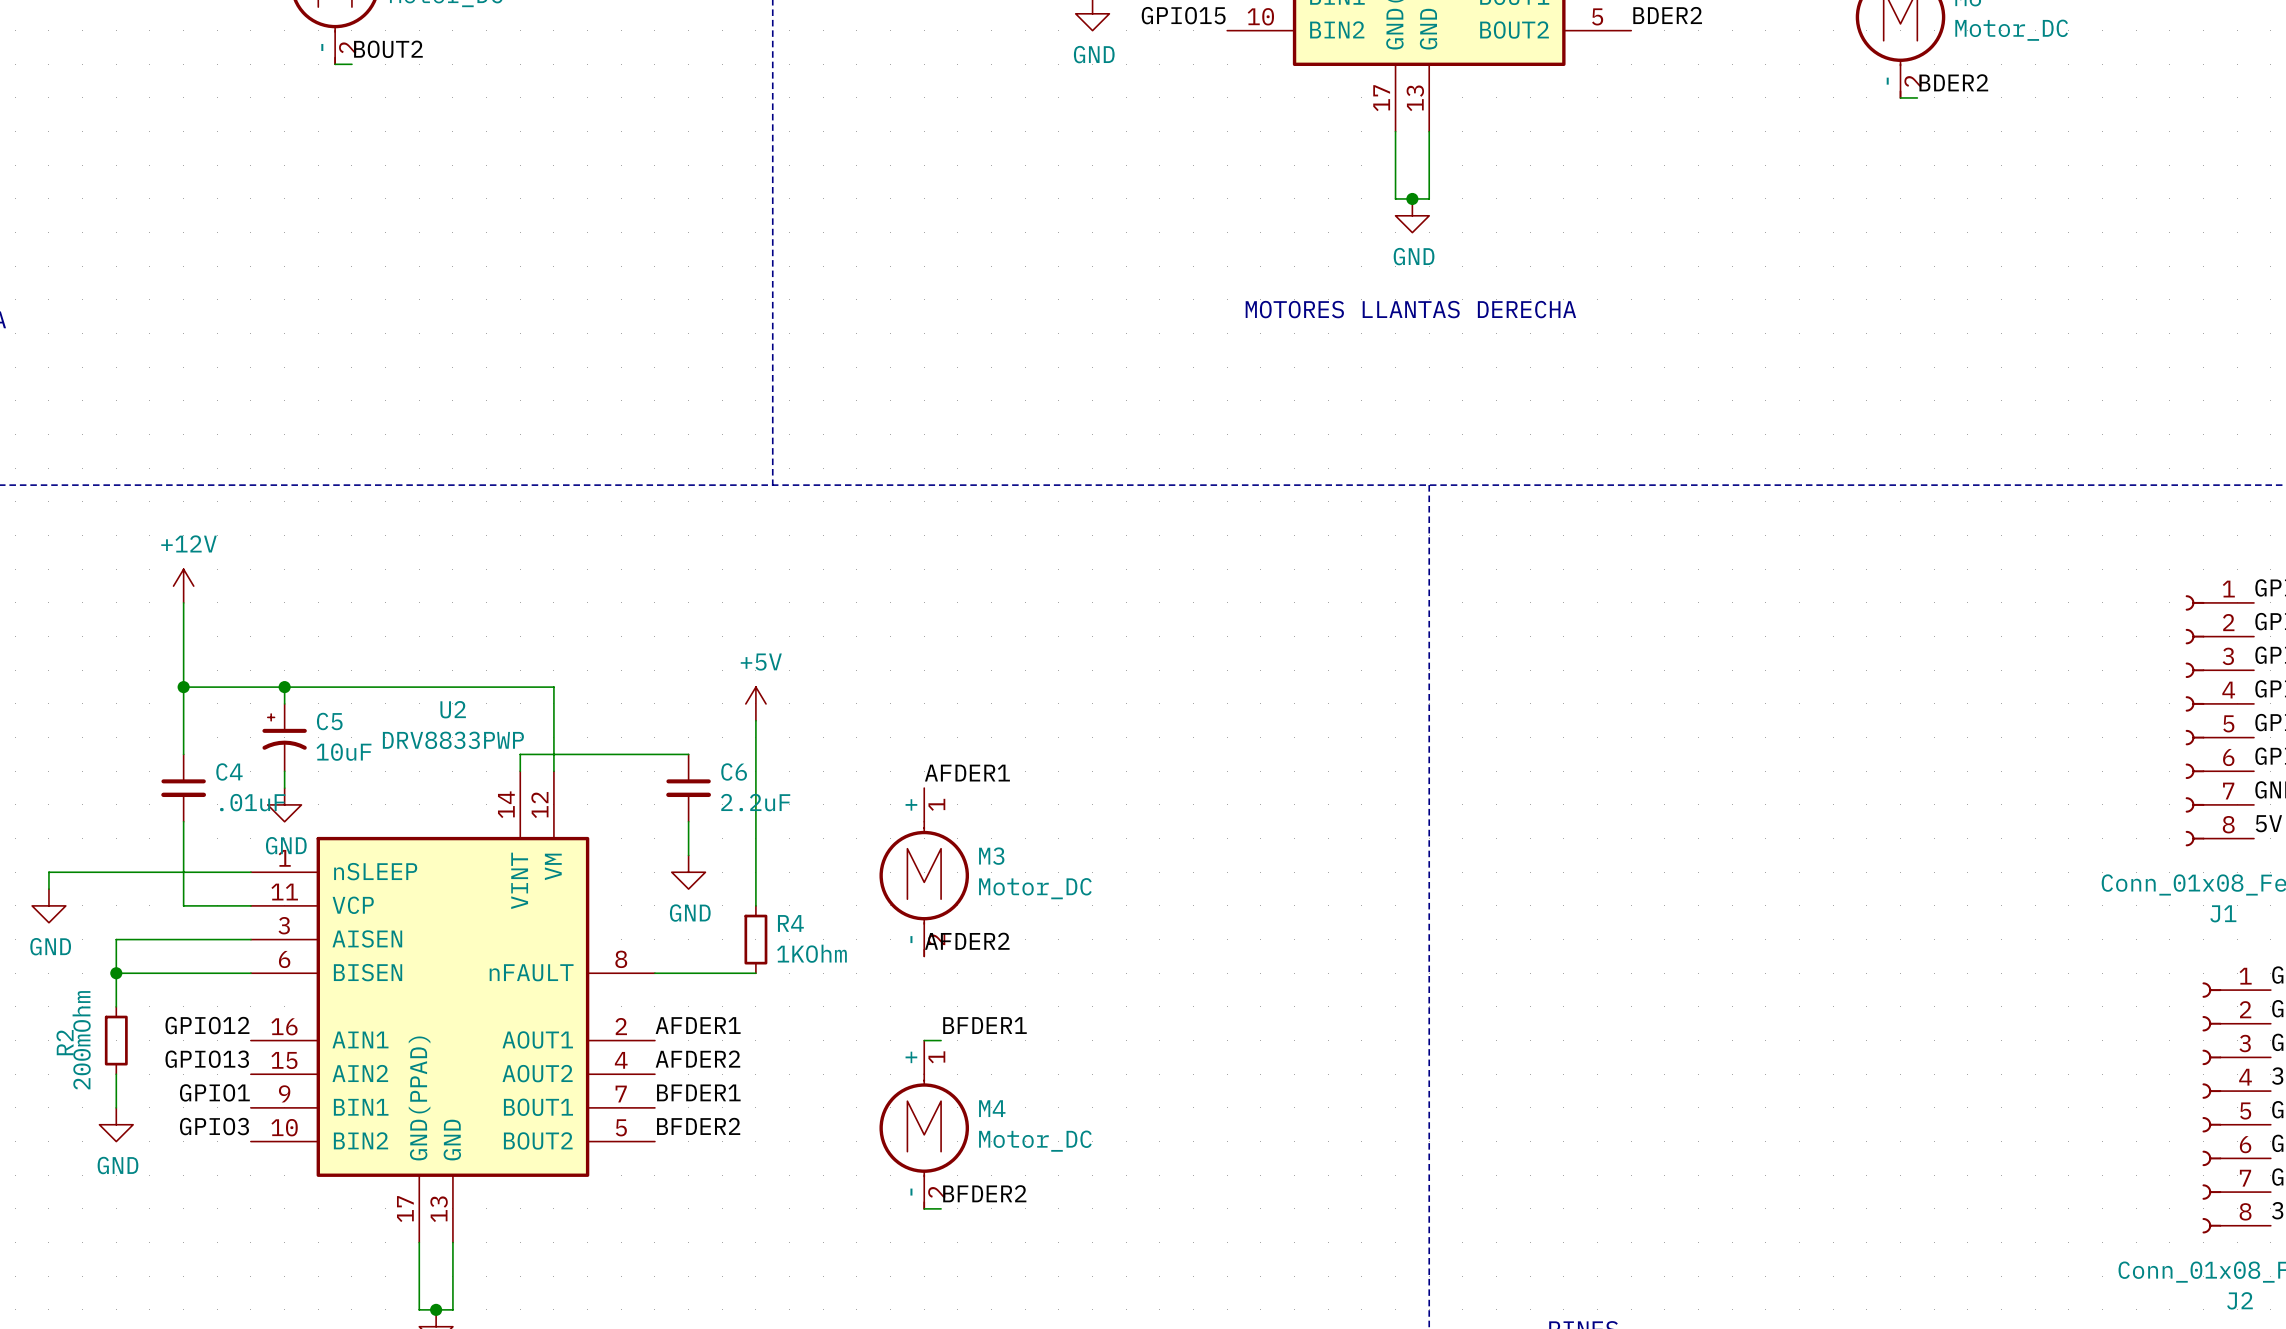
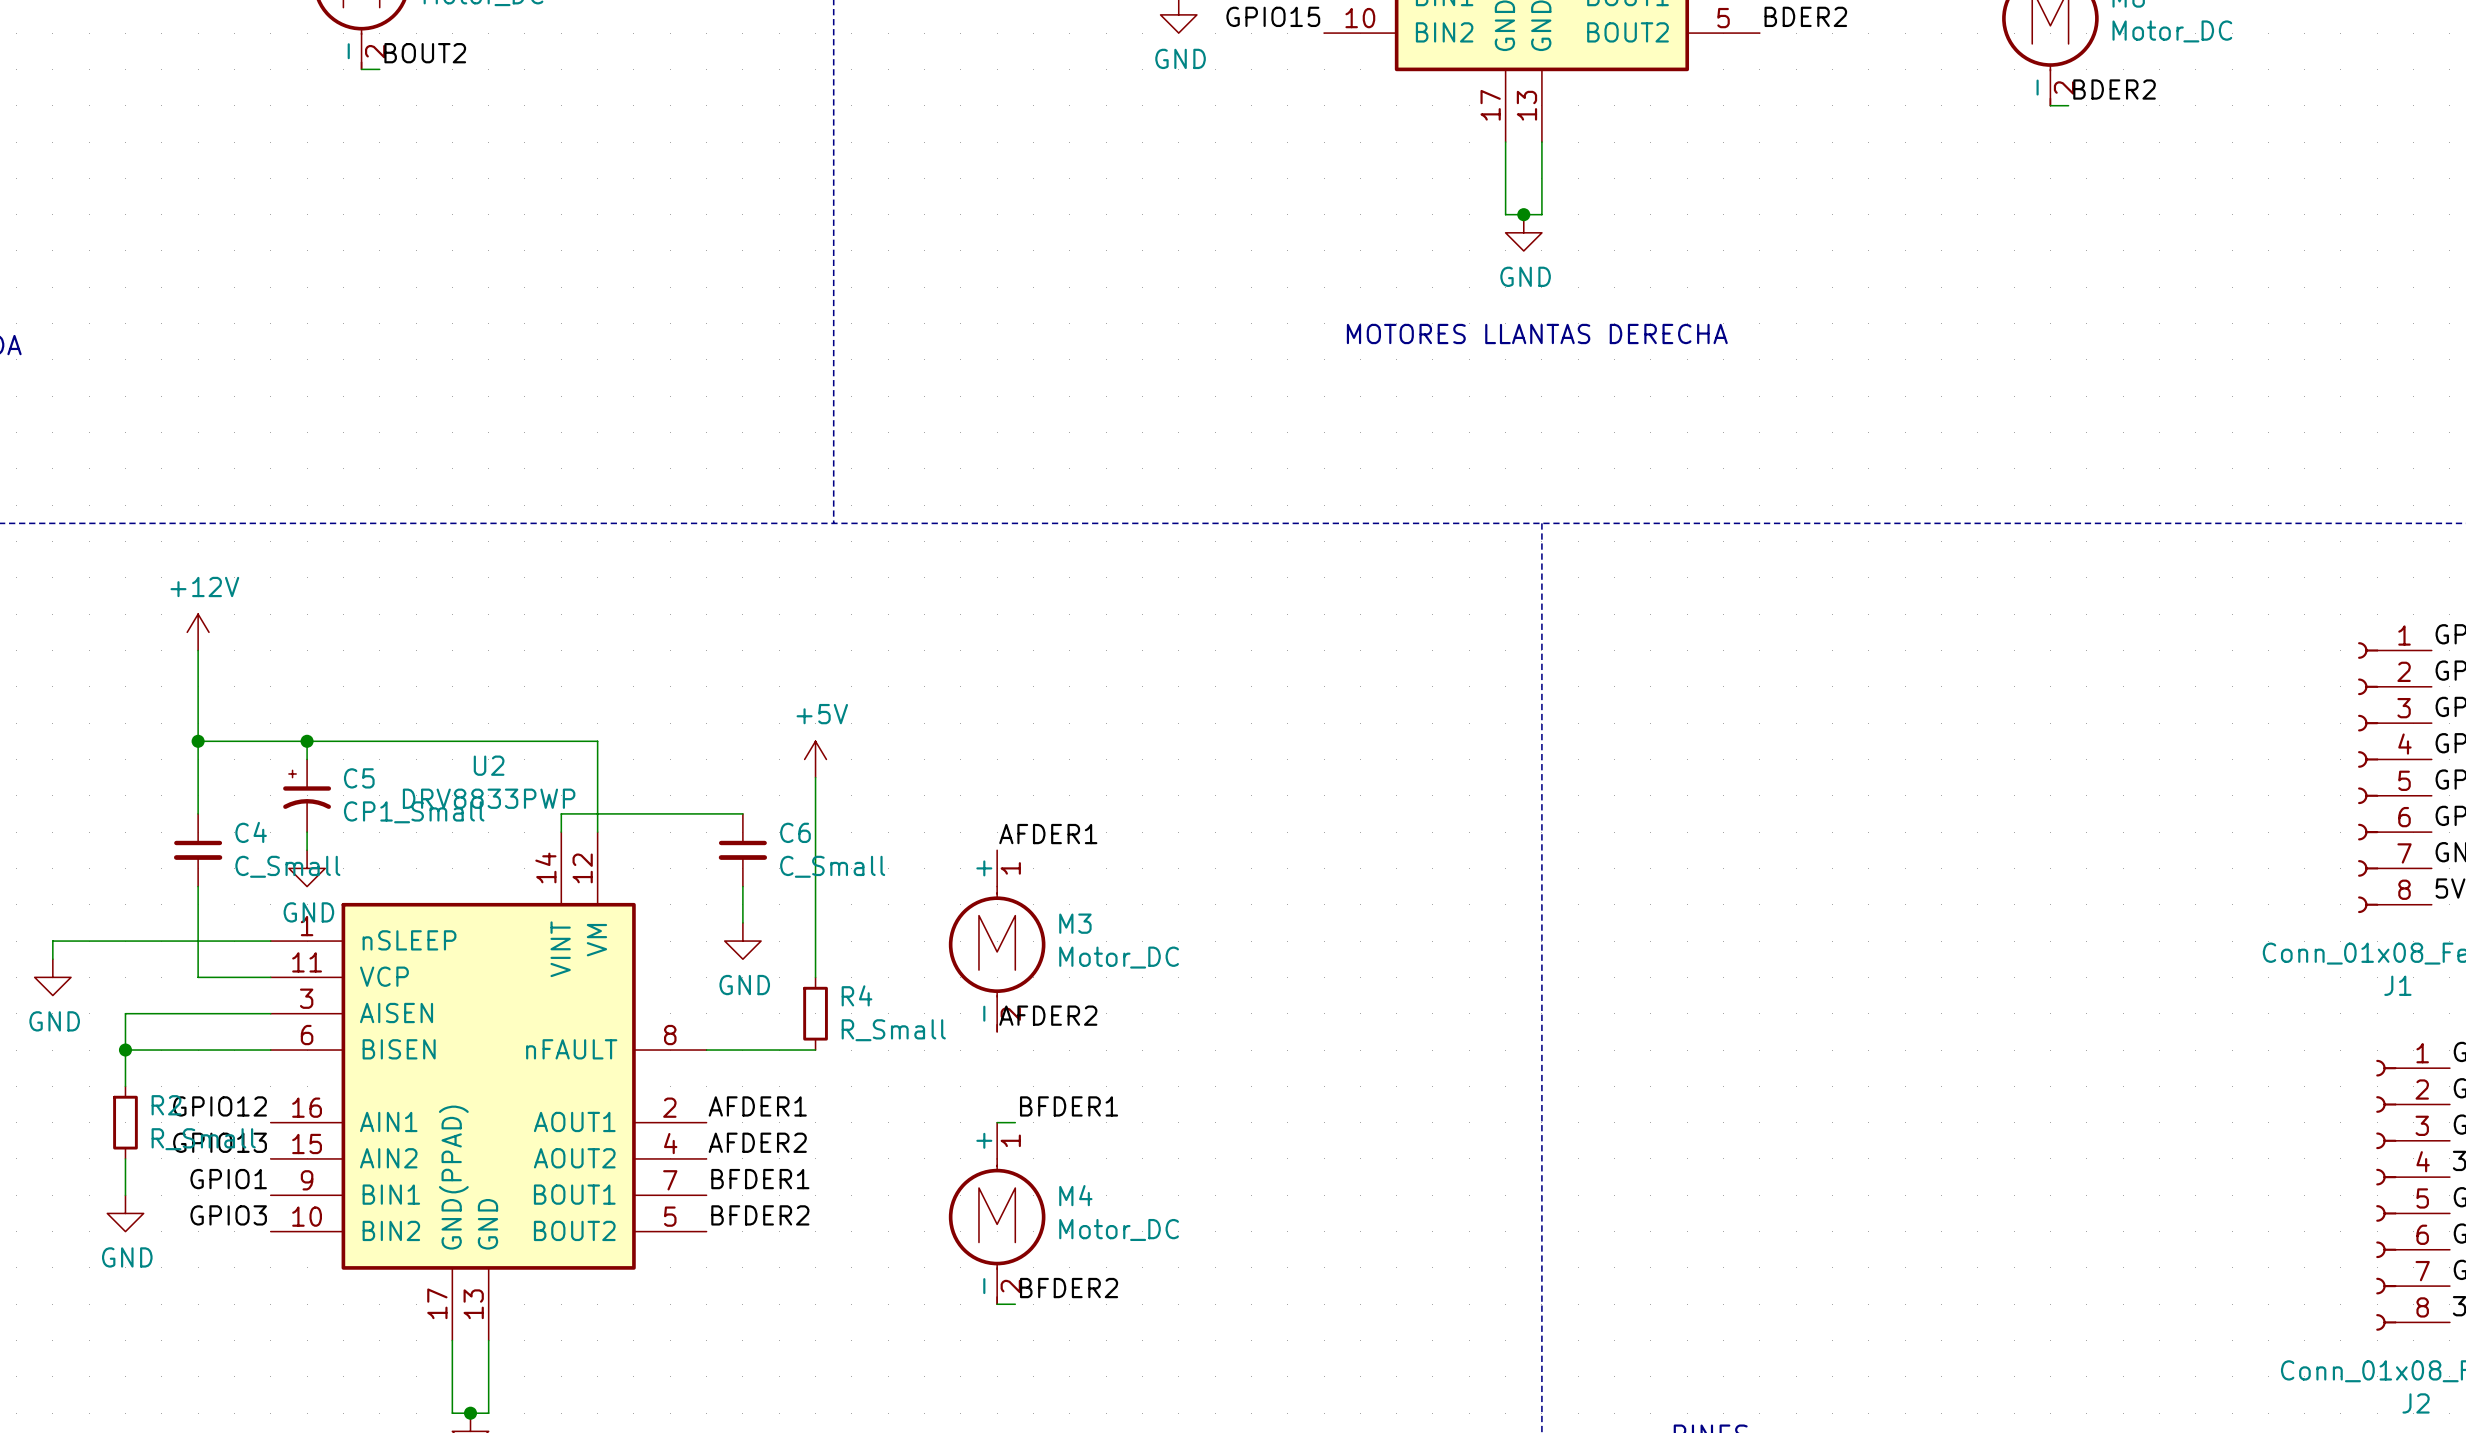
C5 value: 10uF (343, 752) -> CP1_Small (414, 812)
C4 value: .01uF (252, 802) -> C_Small (287, 866)
C6 value: 2.2uF (755, 802) -> C_Small (832, 866)
R4 value: 1KOhm (811, 953) -> R_Small (893, 1030)
R2 value: 200mOhm (81, 1040) -> R_Small (203, 1139)
R2 name rotation: 0° (65, 1042) -> 90° clockwise (166, 1105)
R2 name position: R2 (65, 1042) -> R2 (166, 1105)

